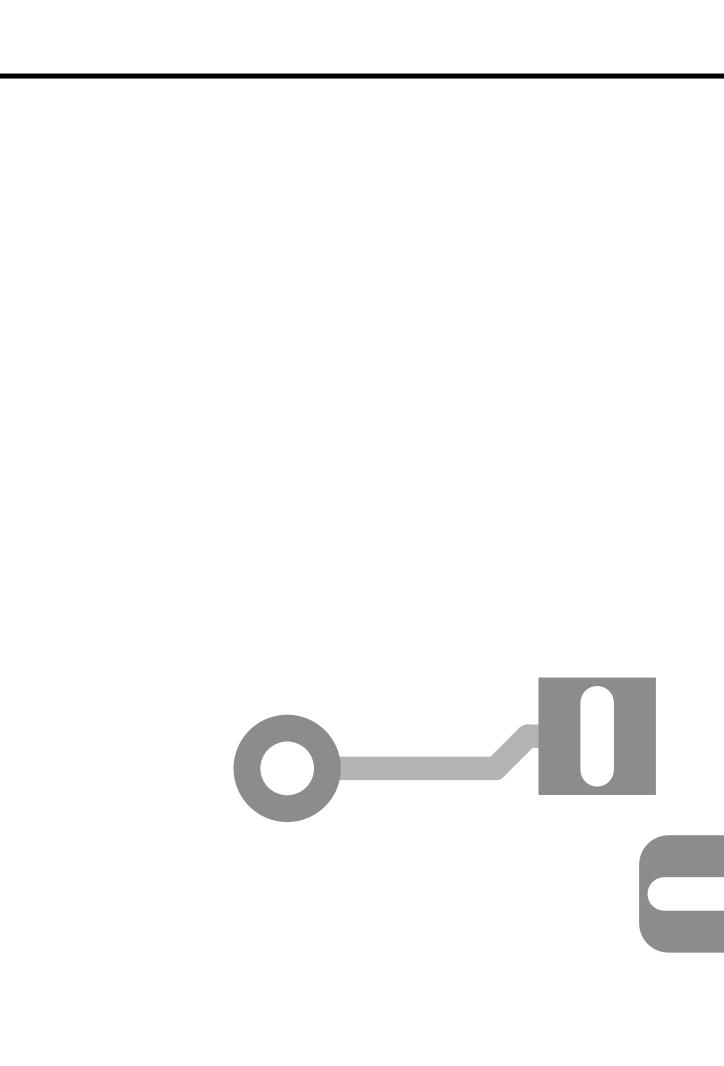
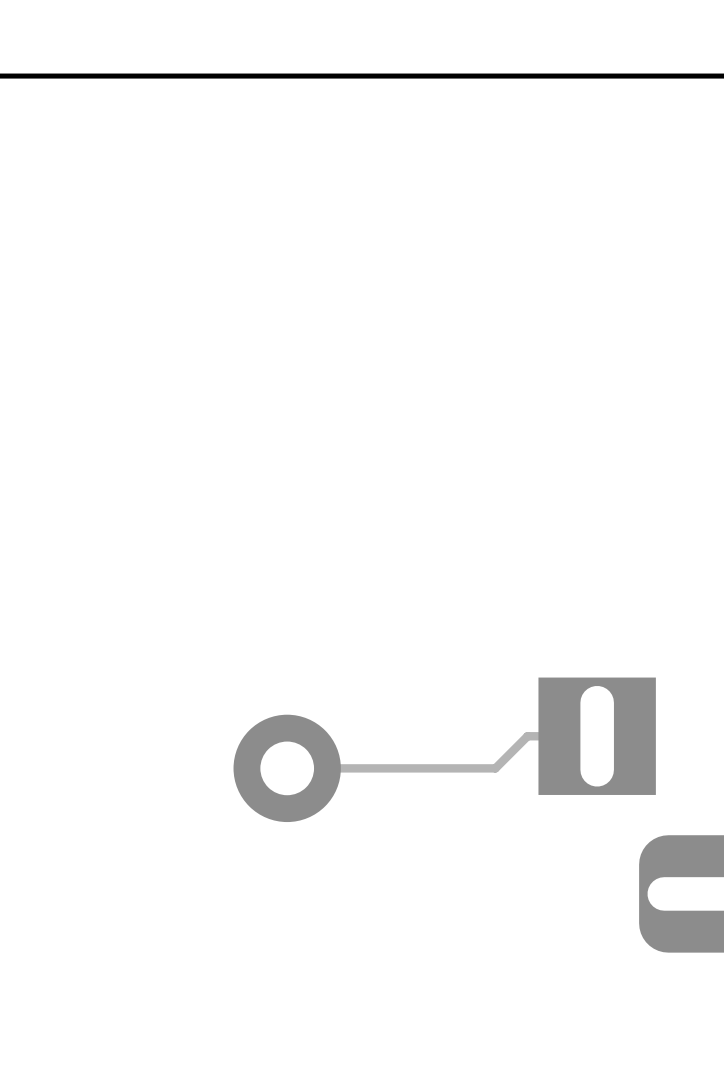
track width: thick (597, 736) (527, 736) (495, 768) (287, 768) -> thin (597, 736) (527, 736) (495, 768) (287, 768)

